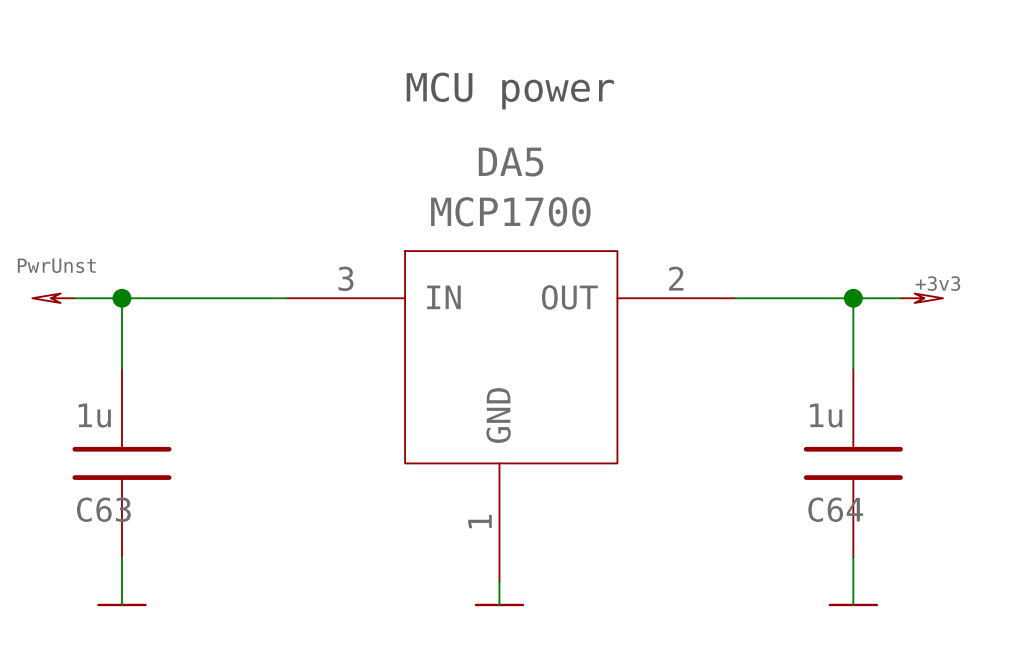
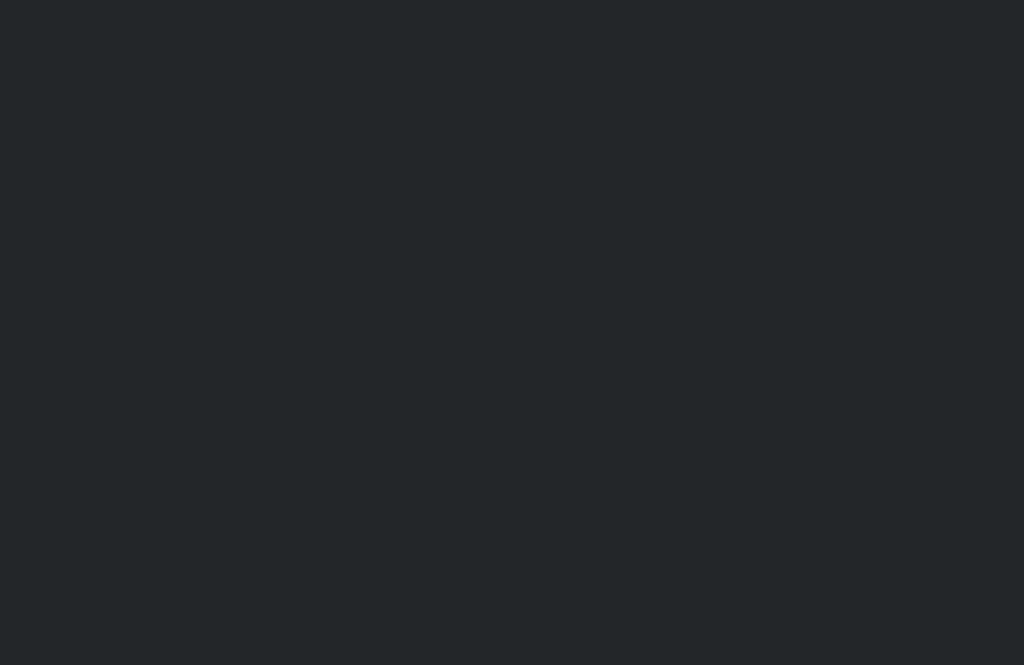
text: MCU power (510, 91) -> none
power symbol: PwrUnst (53, 298) -> none
wire: (74, 298) (287, 298) -> none
wire: (121, 298) (121, 369) -> none
junction: (121, 298) -> none
wire: (735, 298) (900, 298) -> none
wire: (853, 298) (853, 369) -> none
junction: (853, 298) -> none
power symbol: +3v3 (921, 298) -> none
DA5: MCP1700 (511, 416) -> none
C63: 1u (121, 463) -> none
C64: 1u (853, 463) -> none
wire: (121, 557) (121, 604) -> none
wire: (853, 557) (853, 604) -> none
wire: (499, 581) (499, 604) -> none
power symbol: (121, 604) -> none
power symbol: (499, 604) -> none
power symbol: (853, 604) -> none

